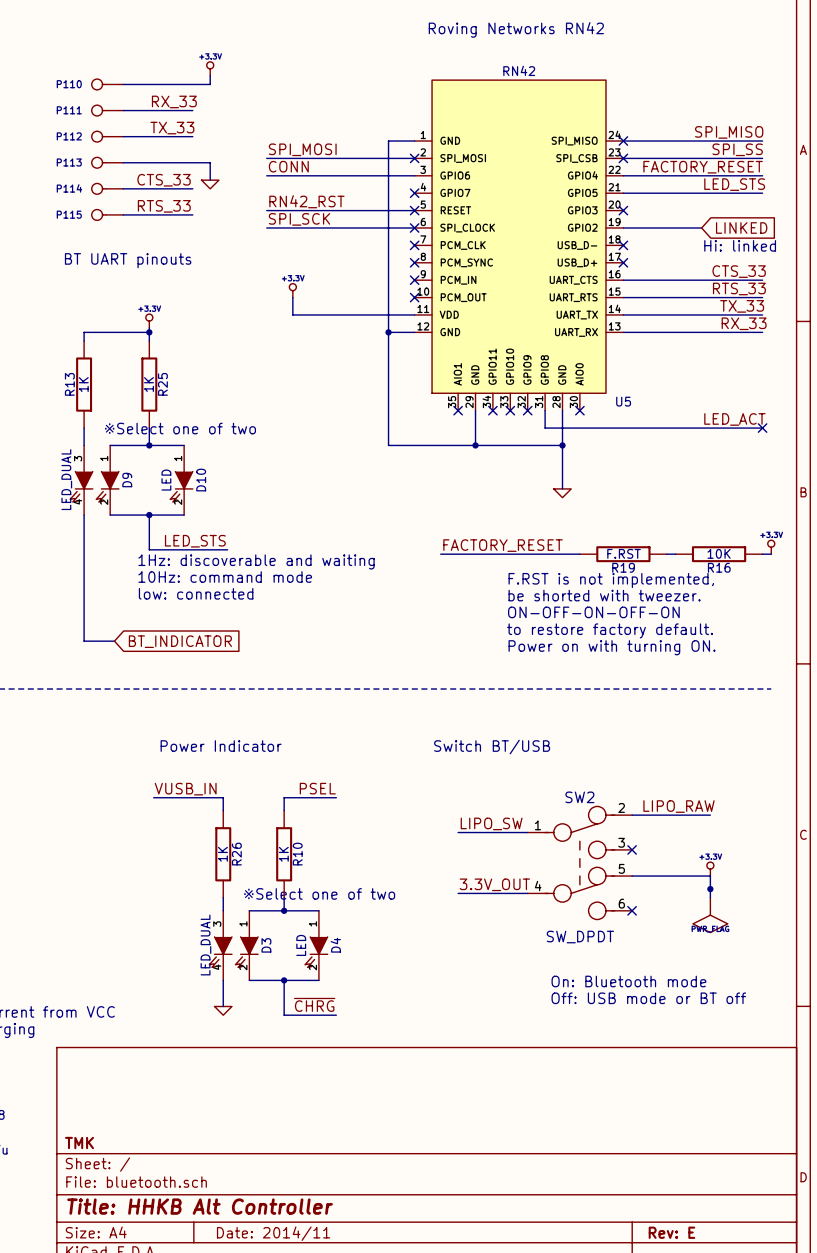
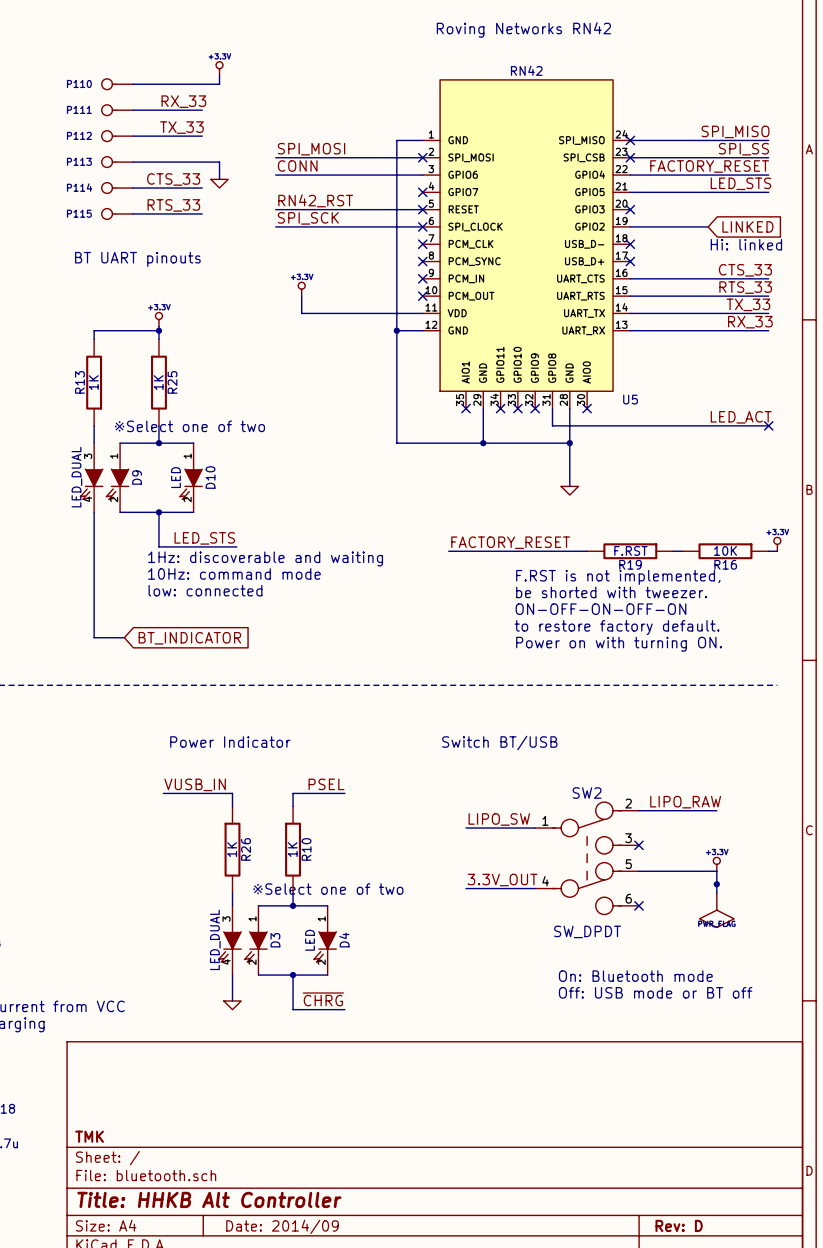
title block: Rev: E (671, 1232) -> Rev: D (679, 1225)
title block: Date: 2014/11 (273, 1233) -> Date: 2014/09 (282, 1226)

